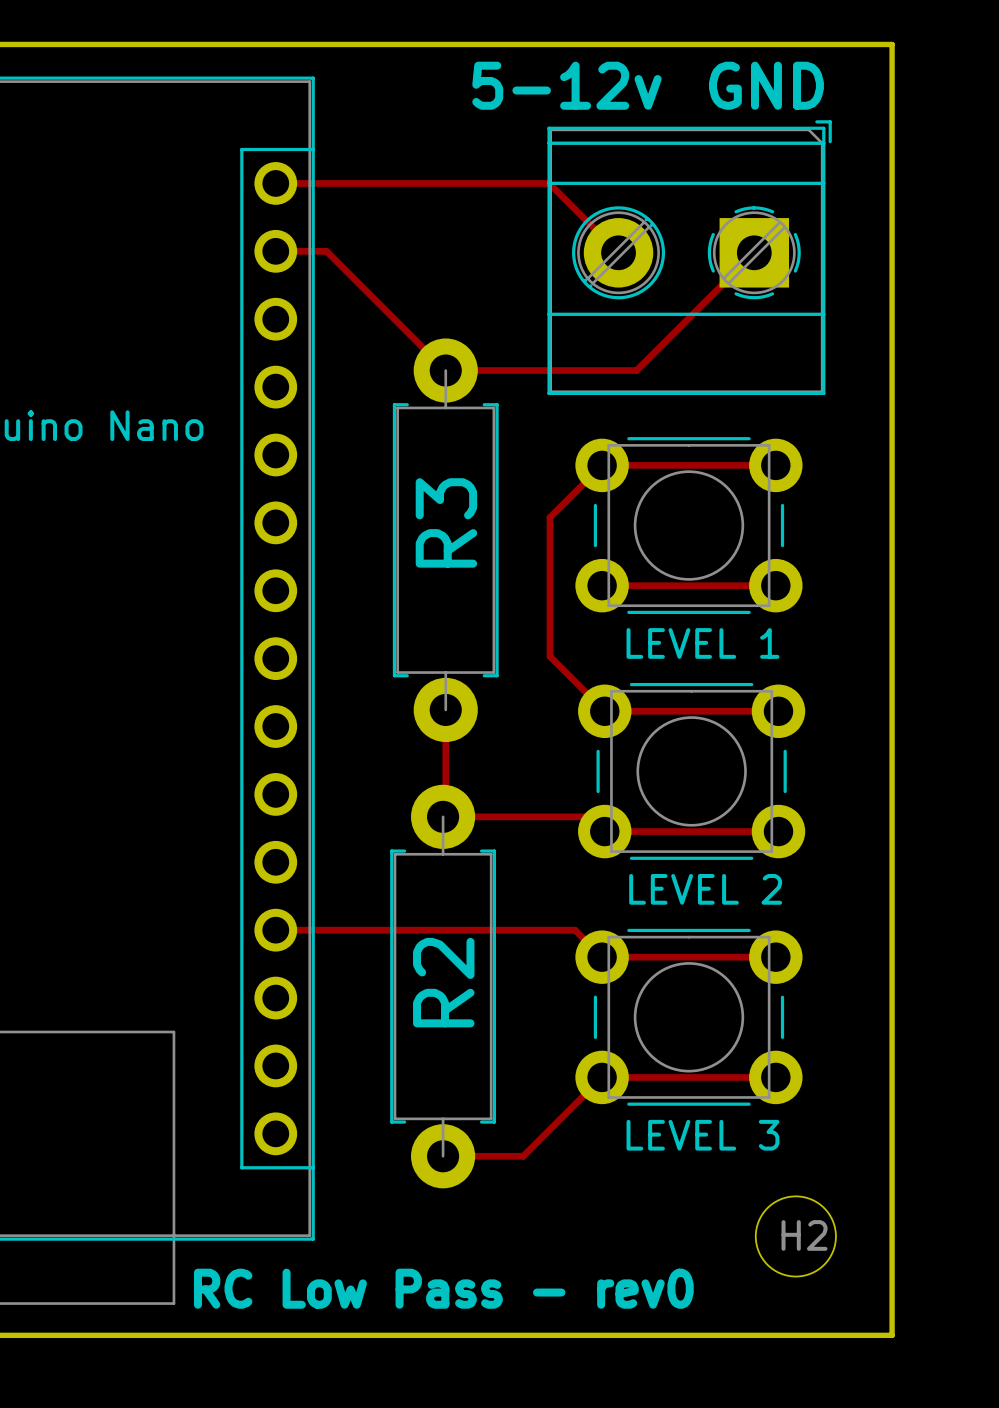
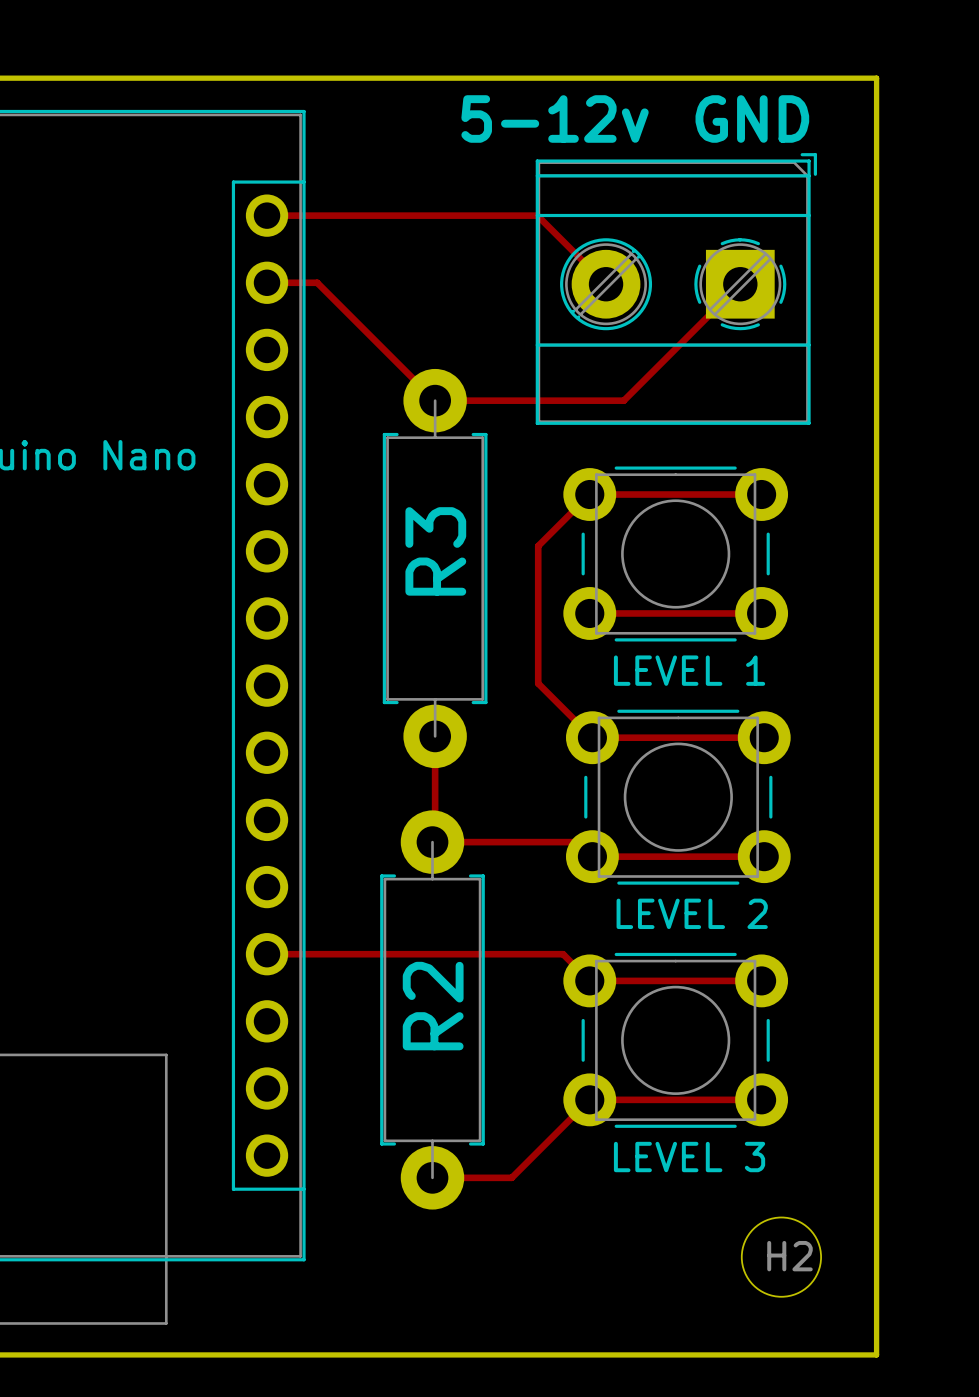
text: RC Low Pass - rev0 (443, 1288) -> none

